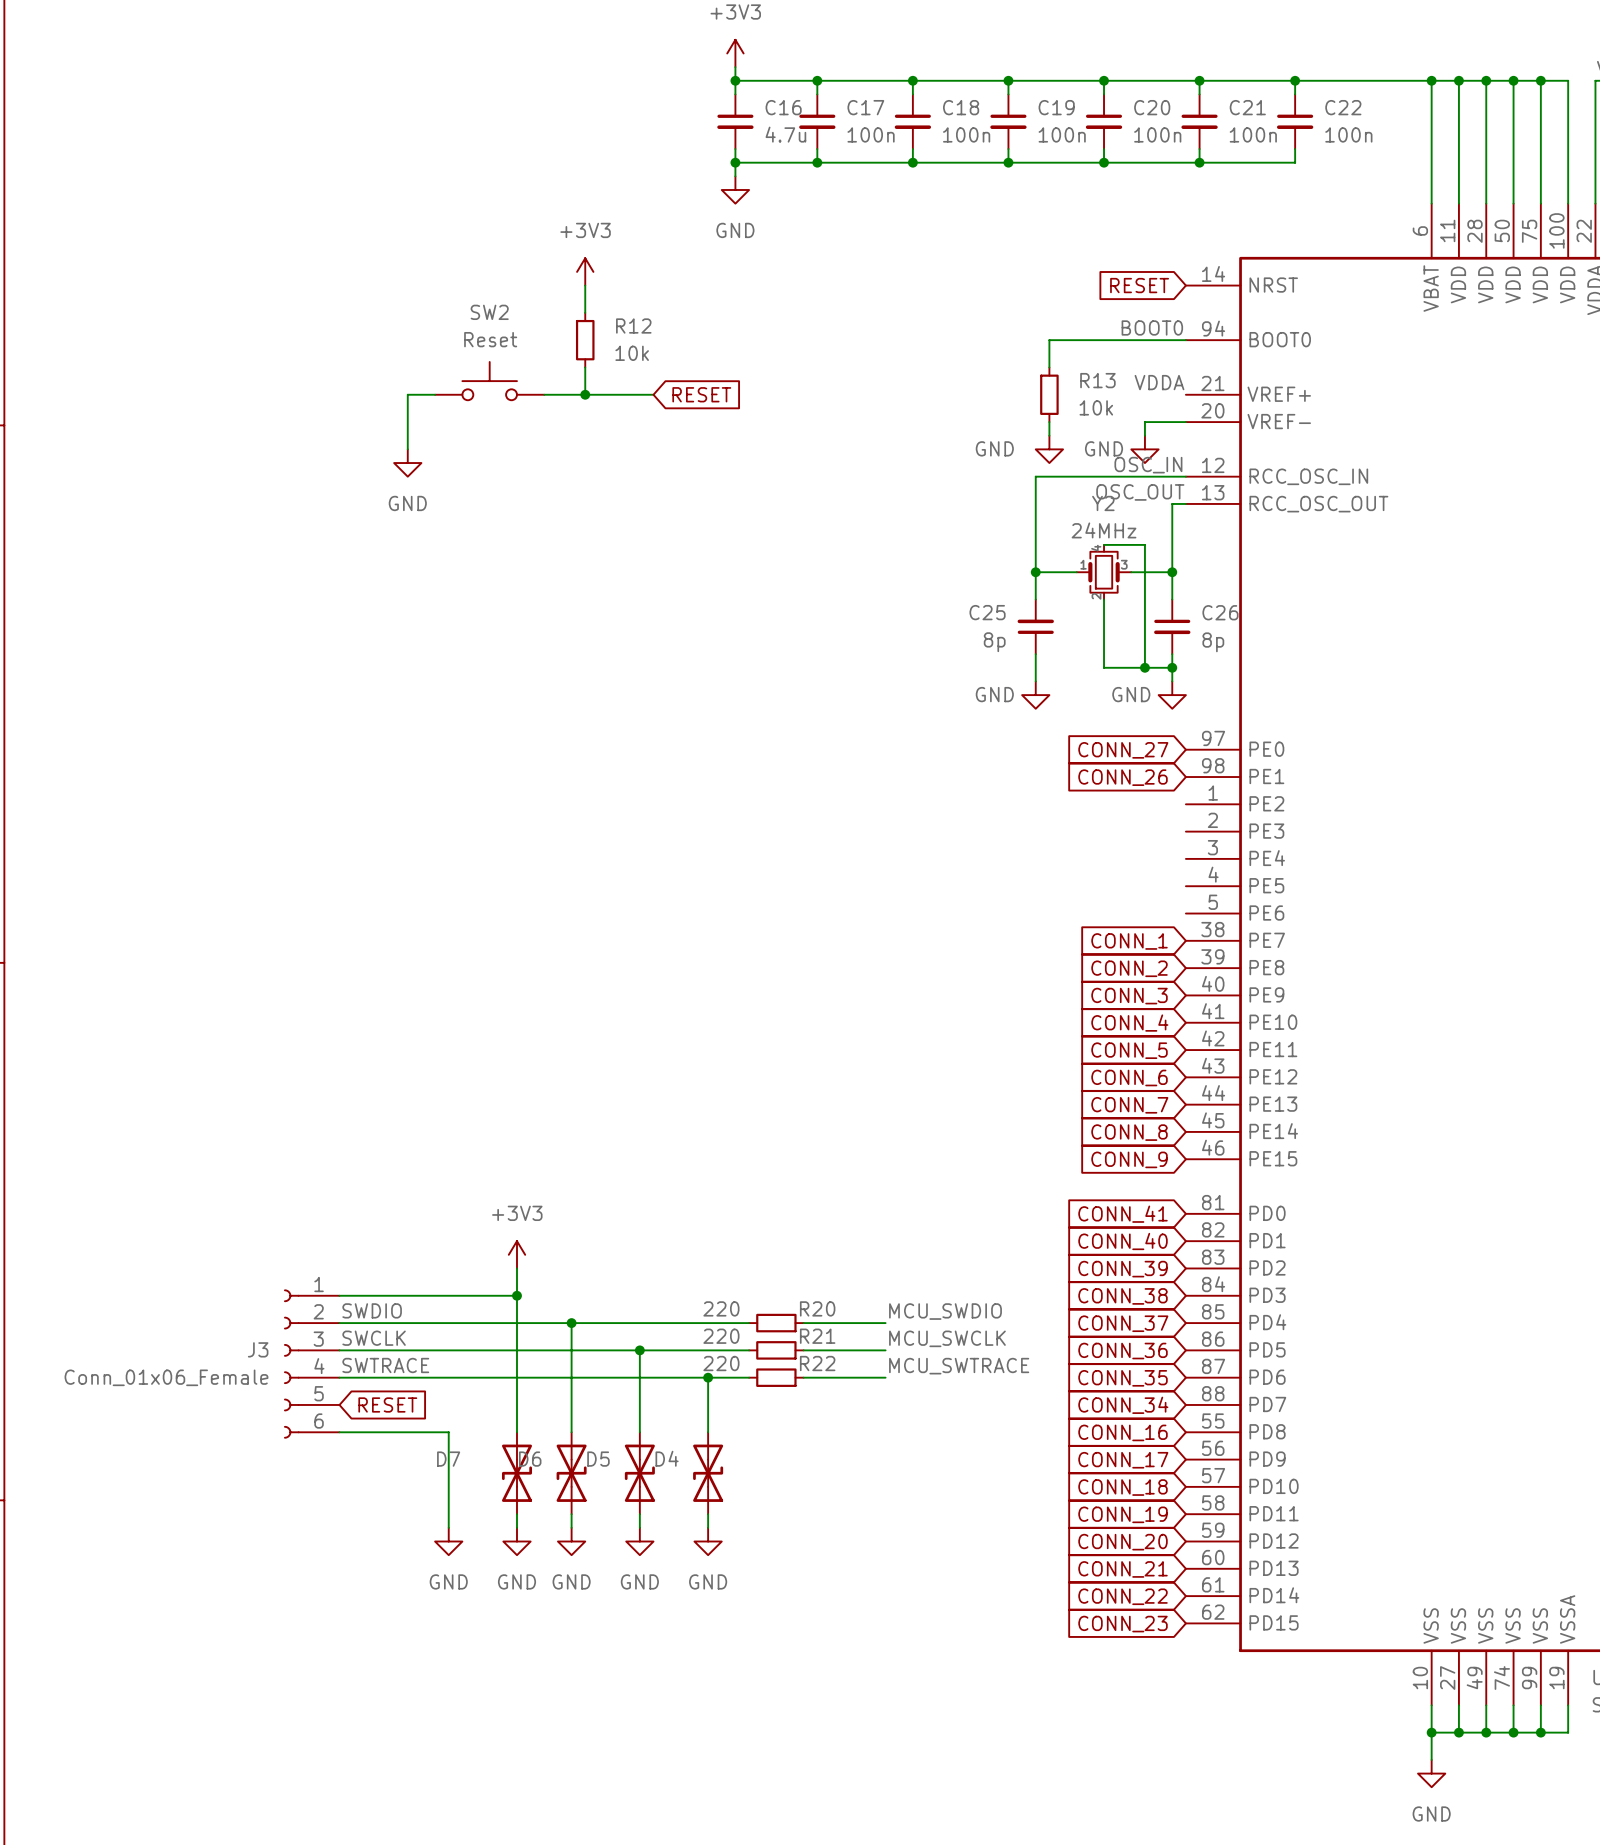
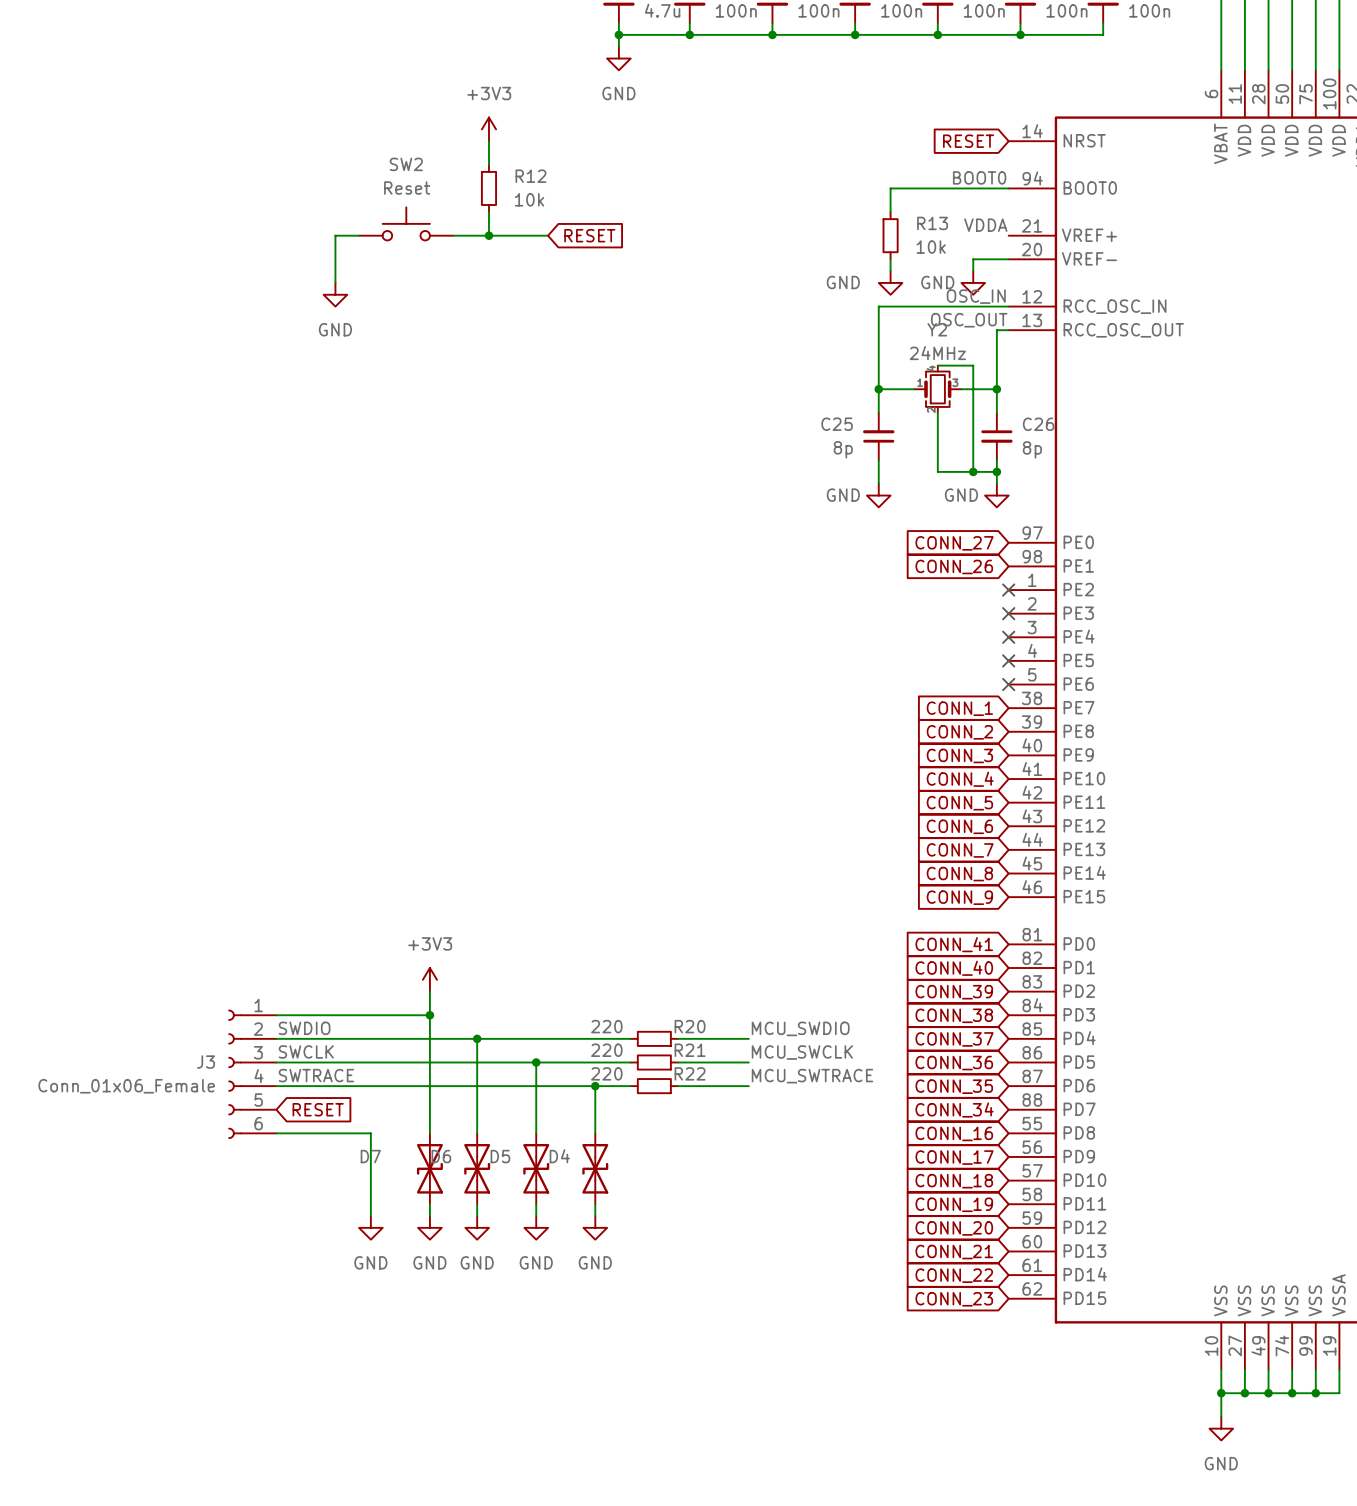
no-connect mark: none -> (1008, 590)
no-connect mark: none -> (1008, 613)
no-connect mark: none -> (1008, 637)
no-connect mark: none -> (1008, 660)
no-connect mark: none -> (1008, 684)

